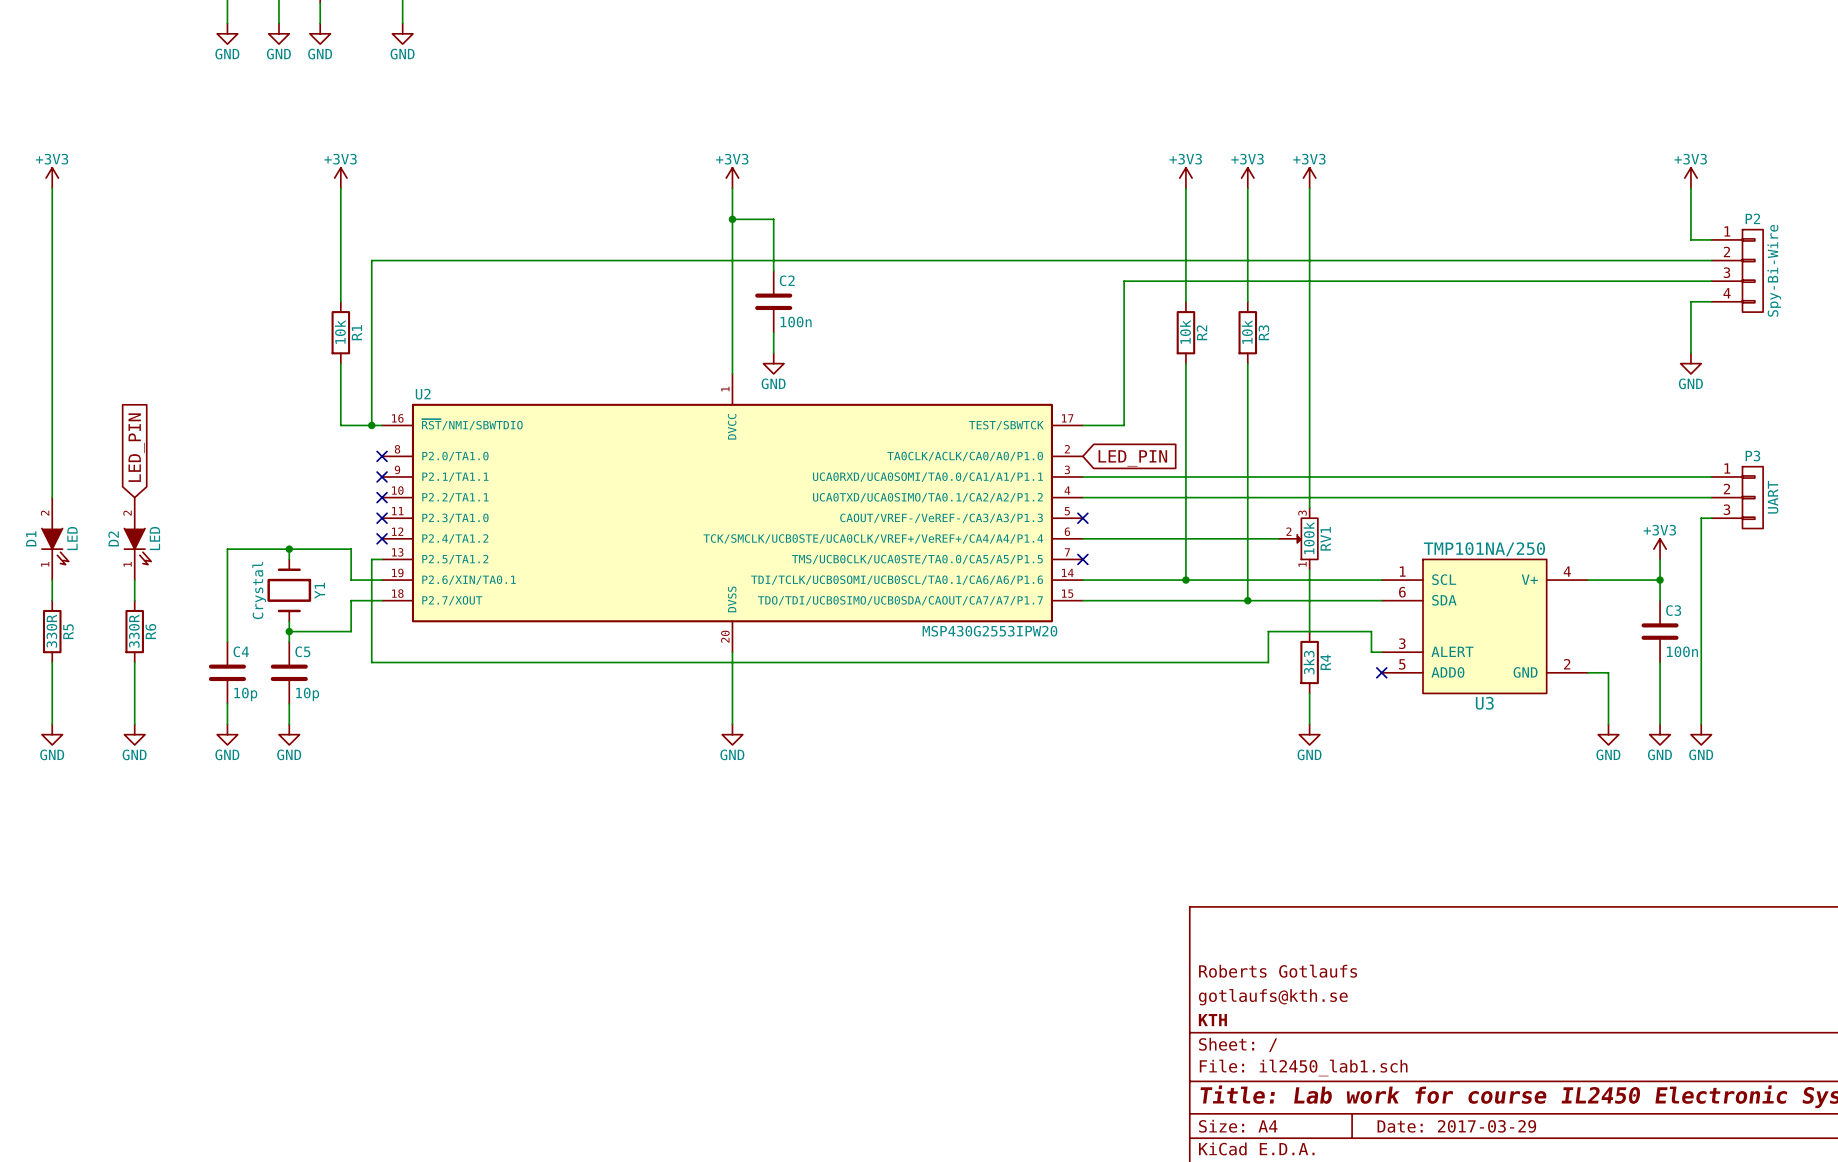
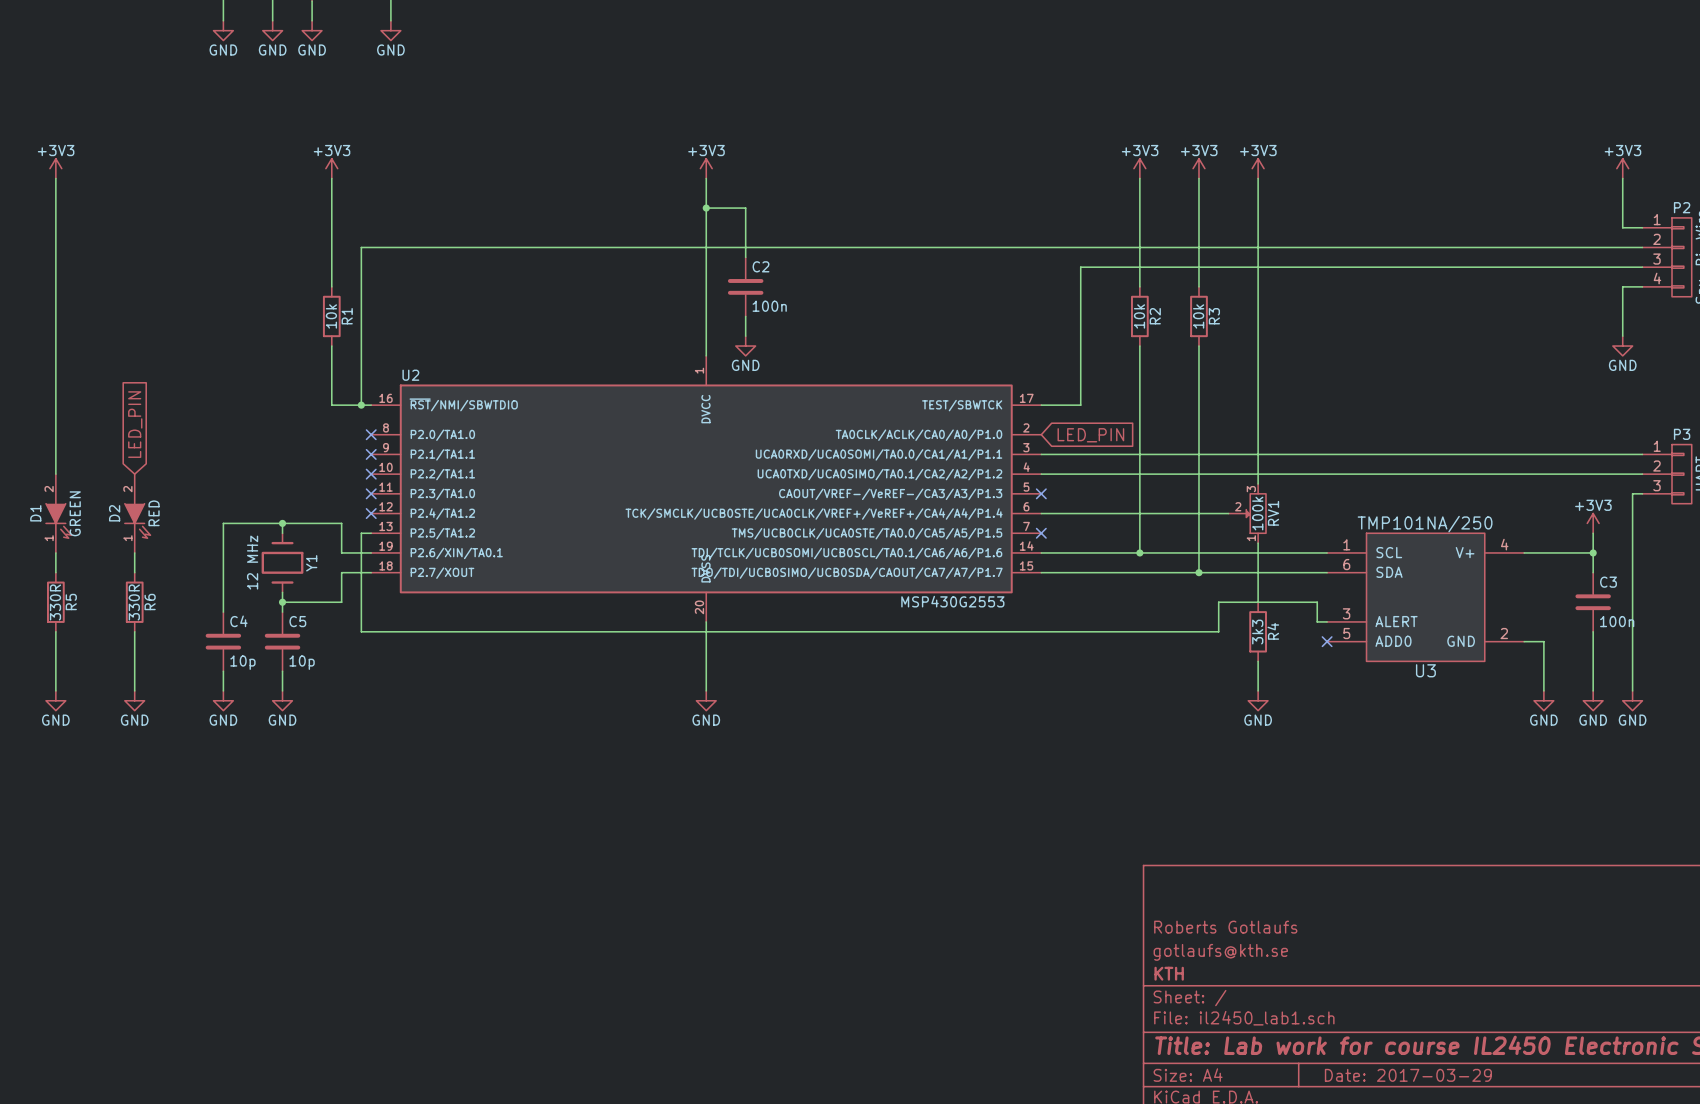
D1 value: LED (72, 538) -> GREEN (75, 513)
D2 value: LED (154, 538) -> RED (154, 513)
Y1 value: Crystal (259, 590) -> 12 MHz (252, 562)
U2 value: MSP430G2553IPW20 (989, 631) -> MSP430G2553 (952, 601)

